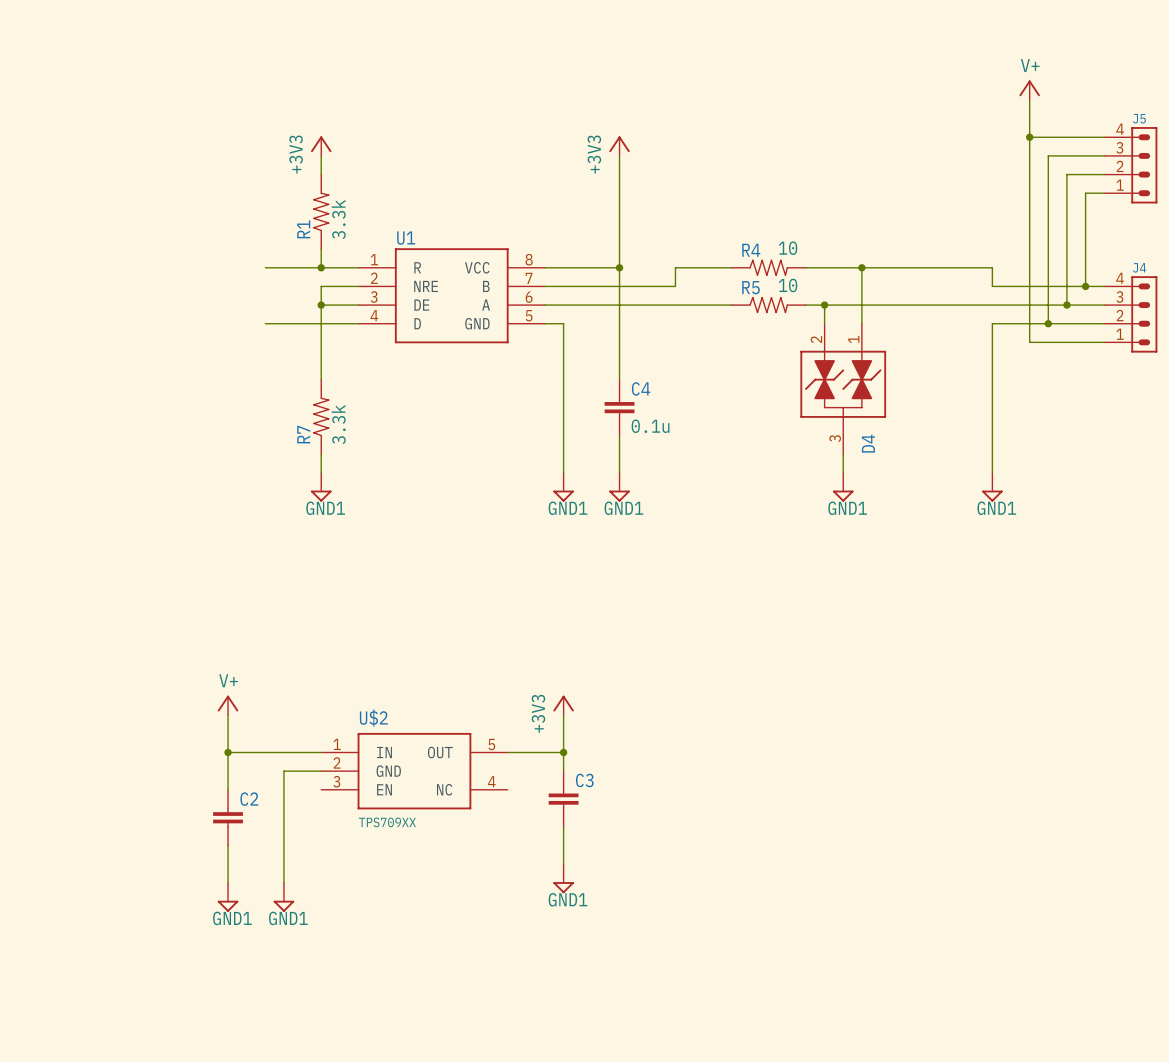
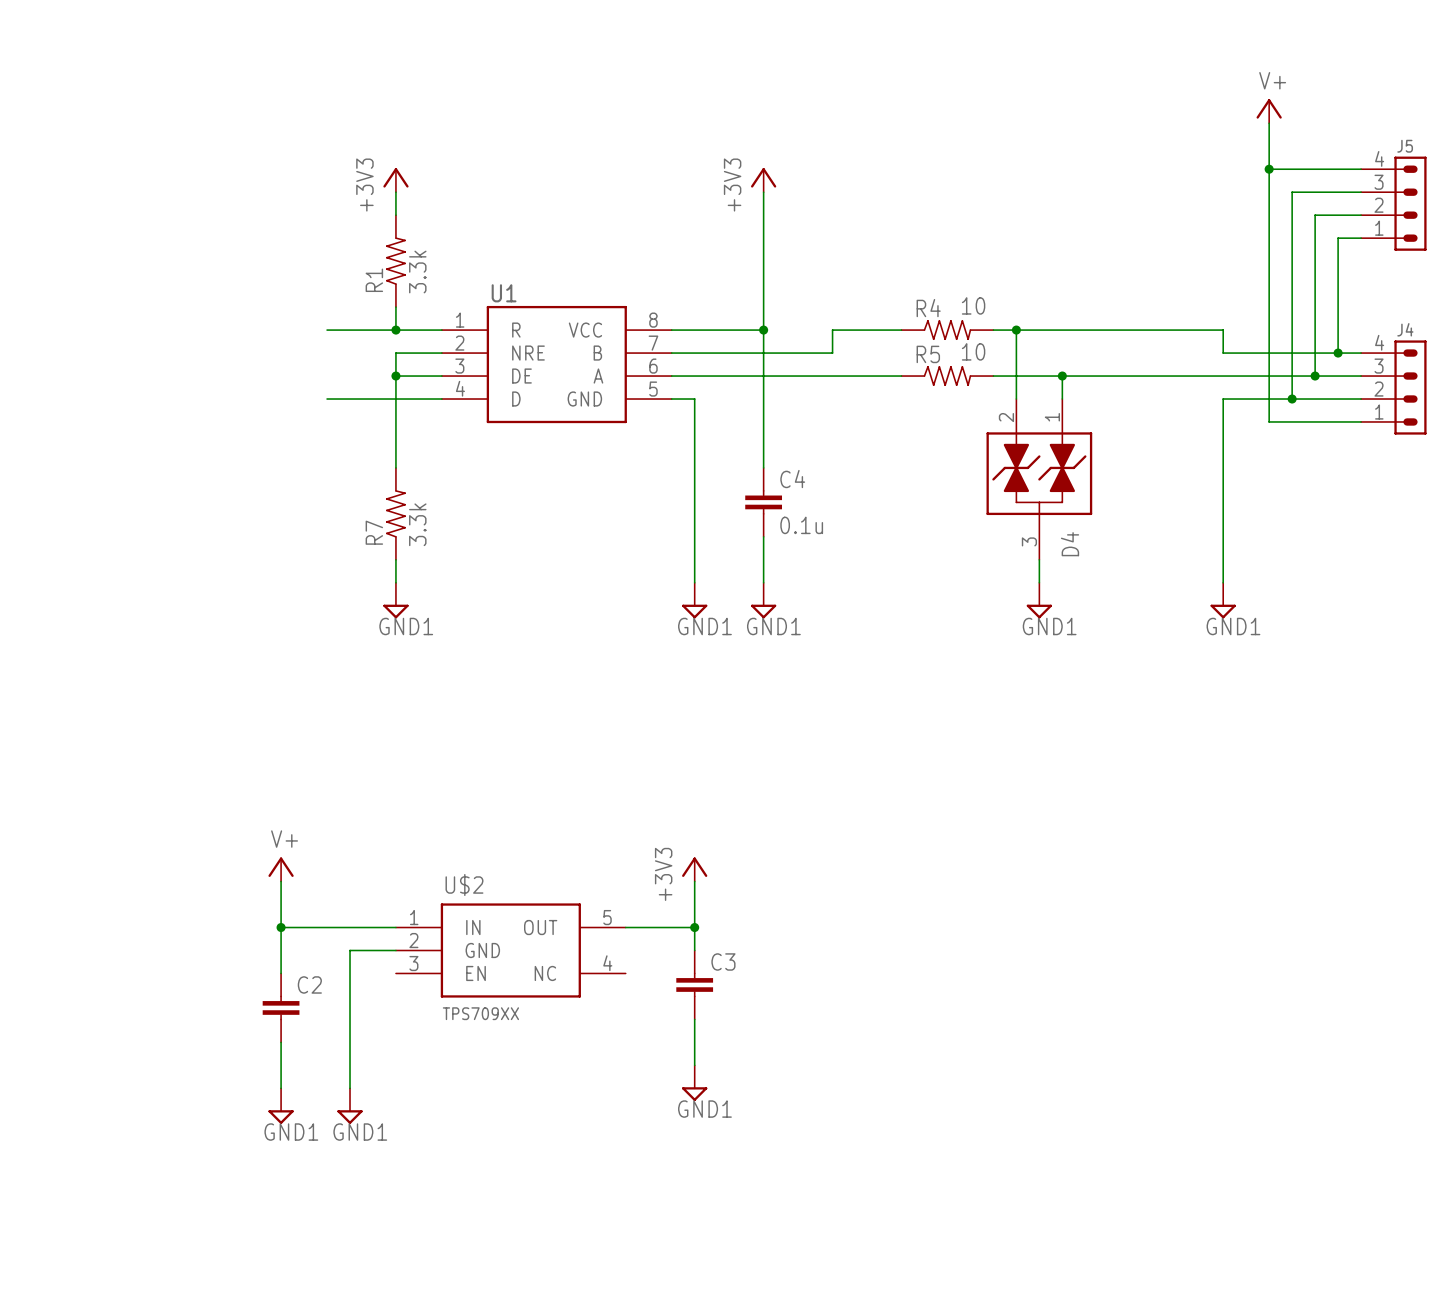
junction: none -> (1016, 330)
wire: (861, 267) (861, 305) -> (1016, 330) (1016, 376)
junction: (861, 267) -> none
junction: (824, 305) -> none
junction: none -> (1062, 376)

